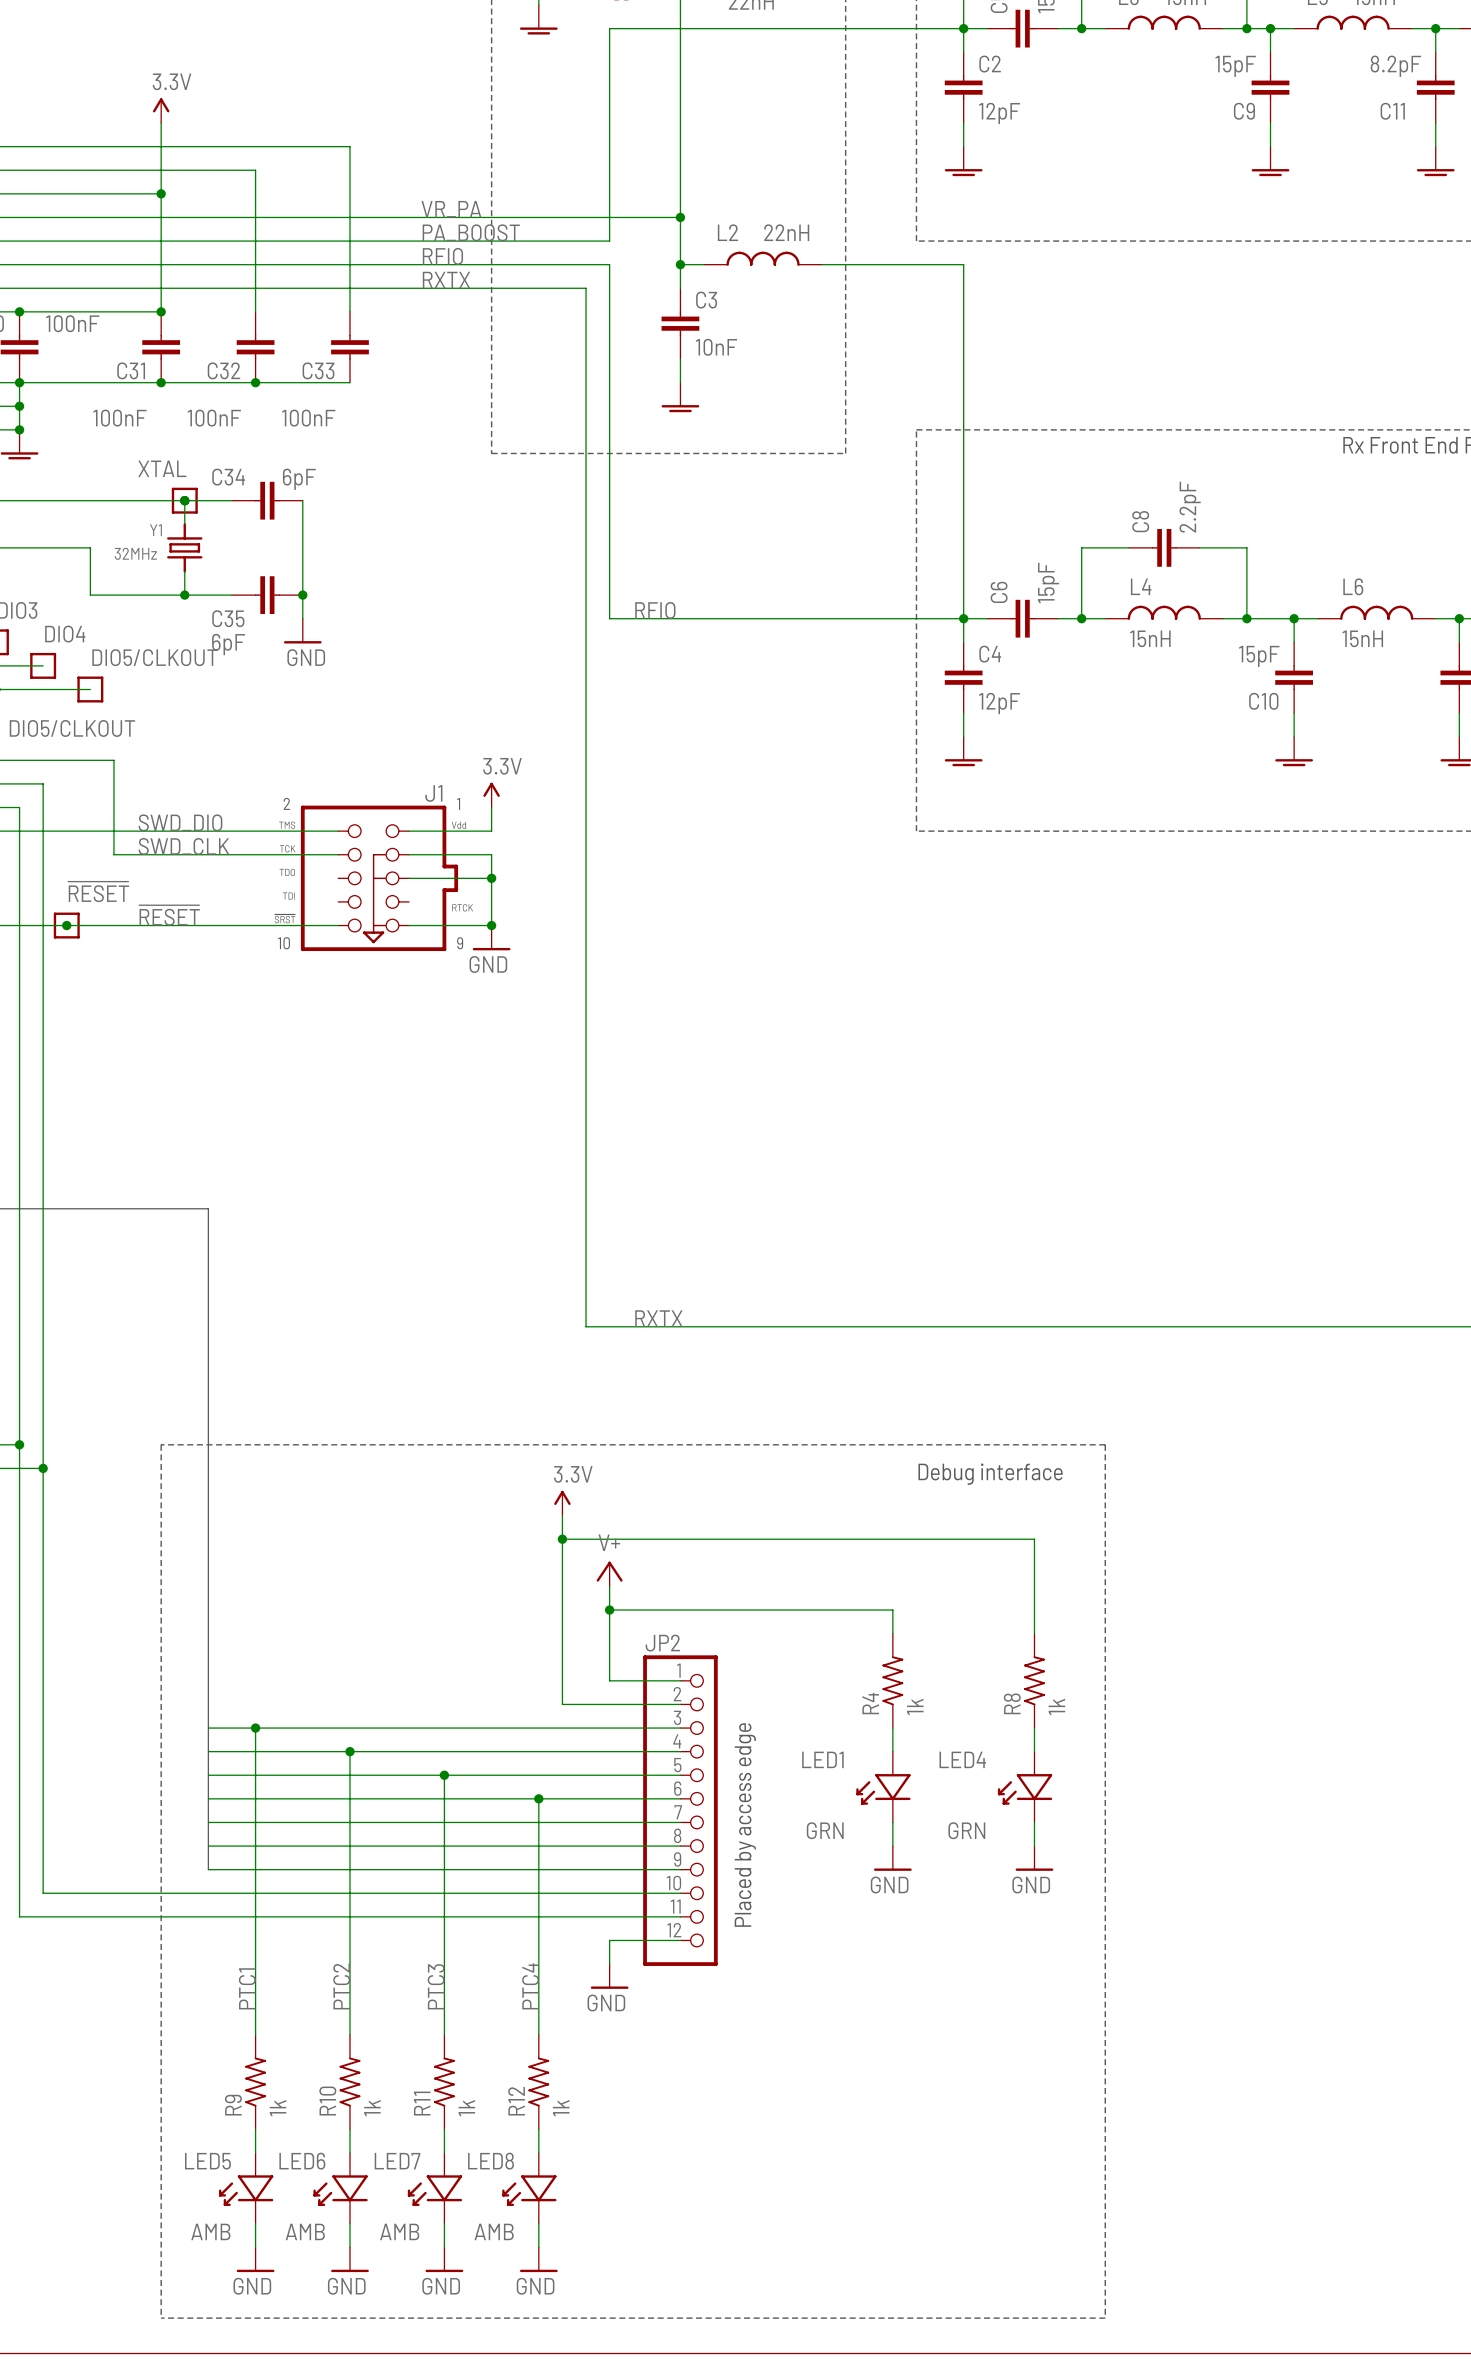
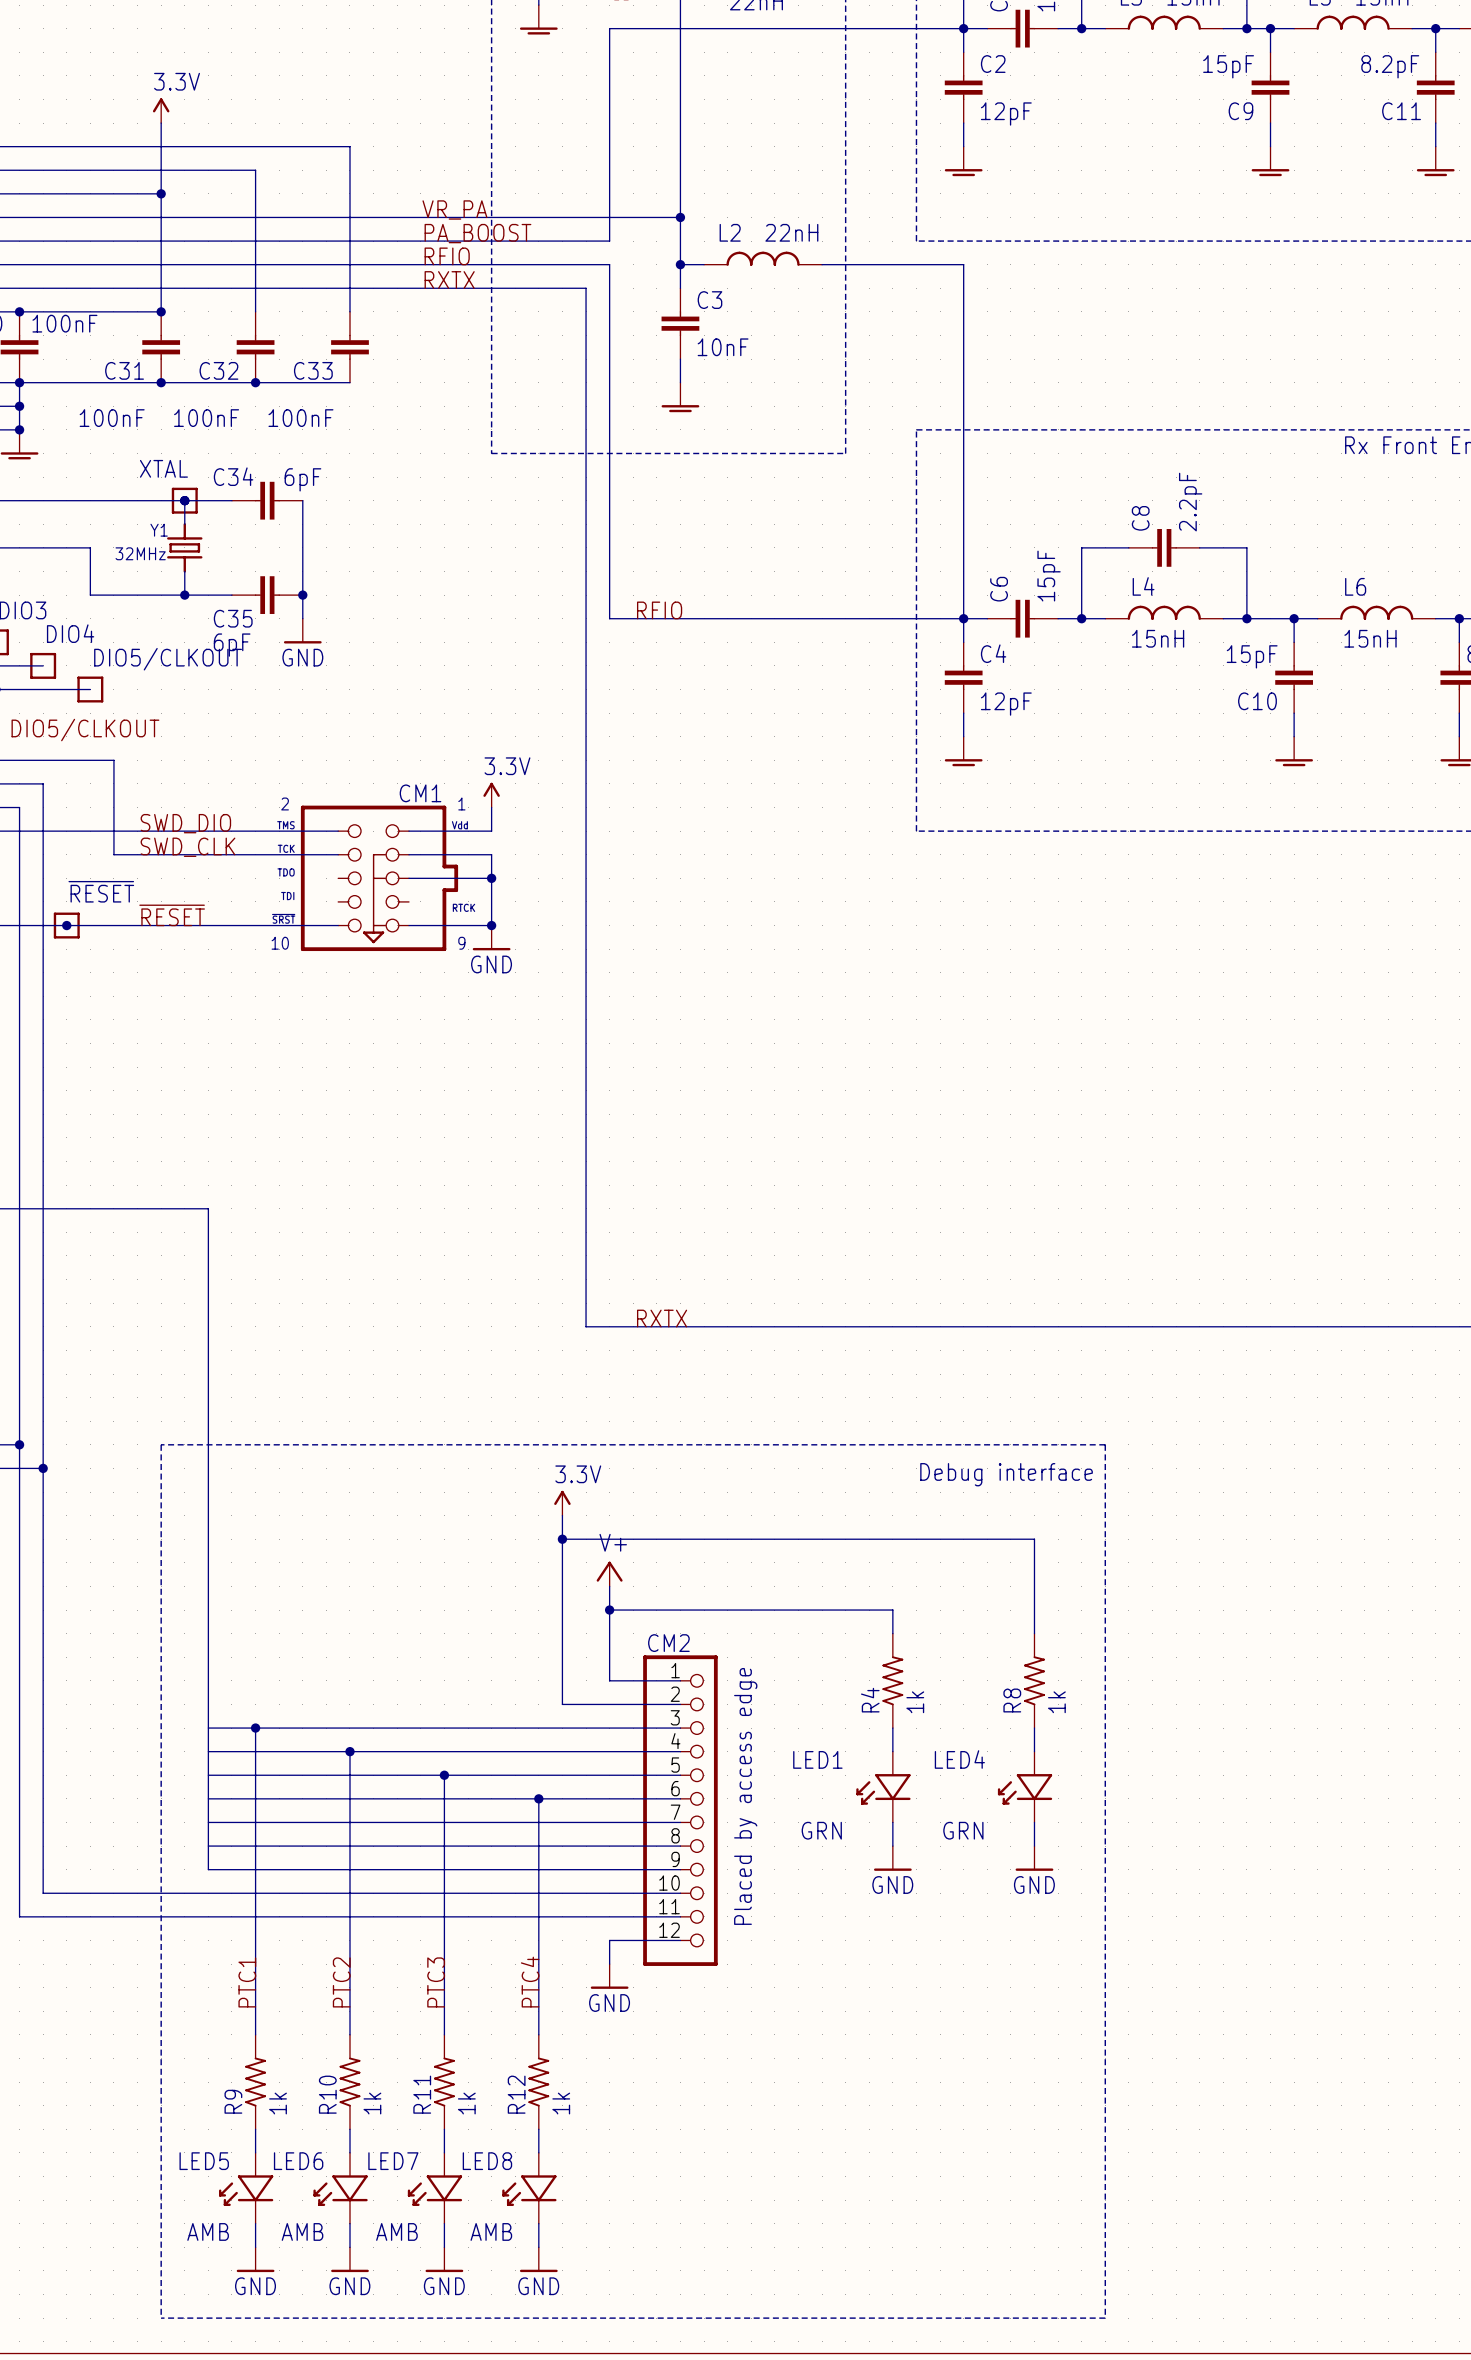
J1 name: J1 (433, 793) -> CM1 (420, 793)
JP2 name: JP2 (662, 1643) -> CM2 (668, 1643)

